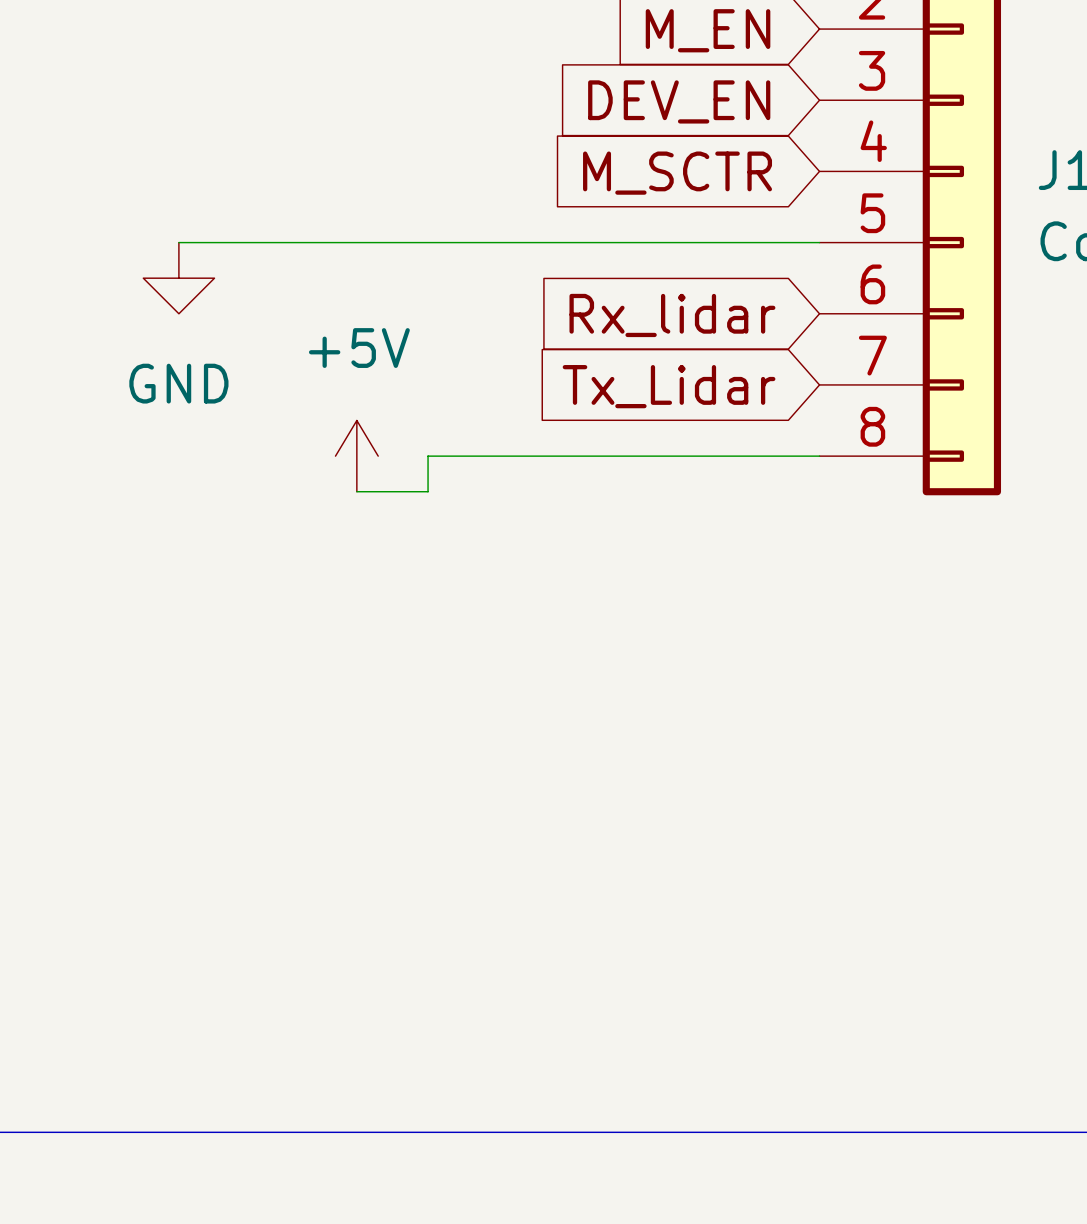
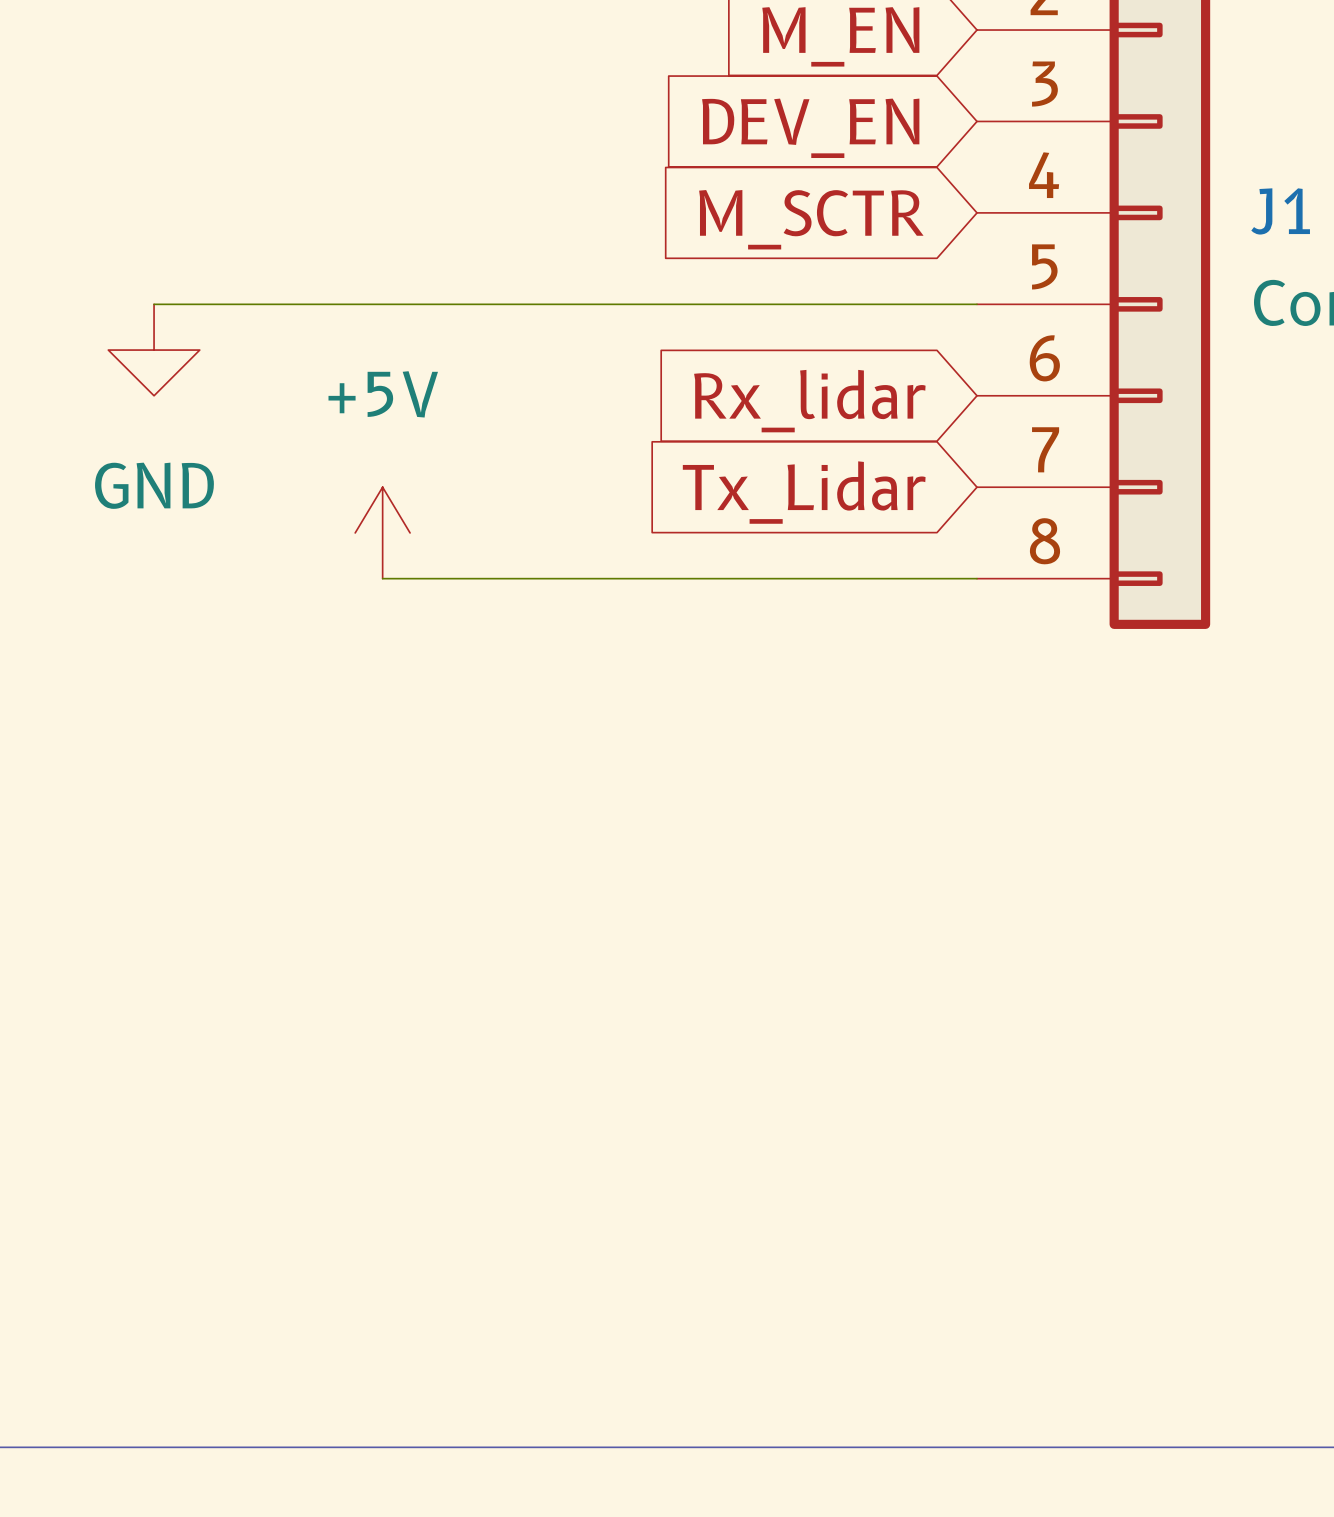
power symbol position: +5V (356, 456) -> +5V (382, 532)
wire: (428, 456) (428, 491) (356, 491) -> (474, 578) (382, 578)

